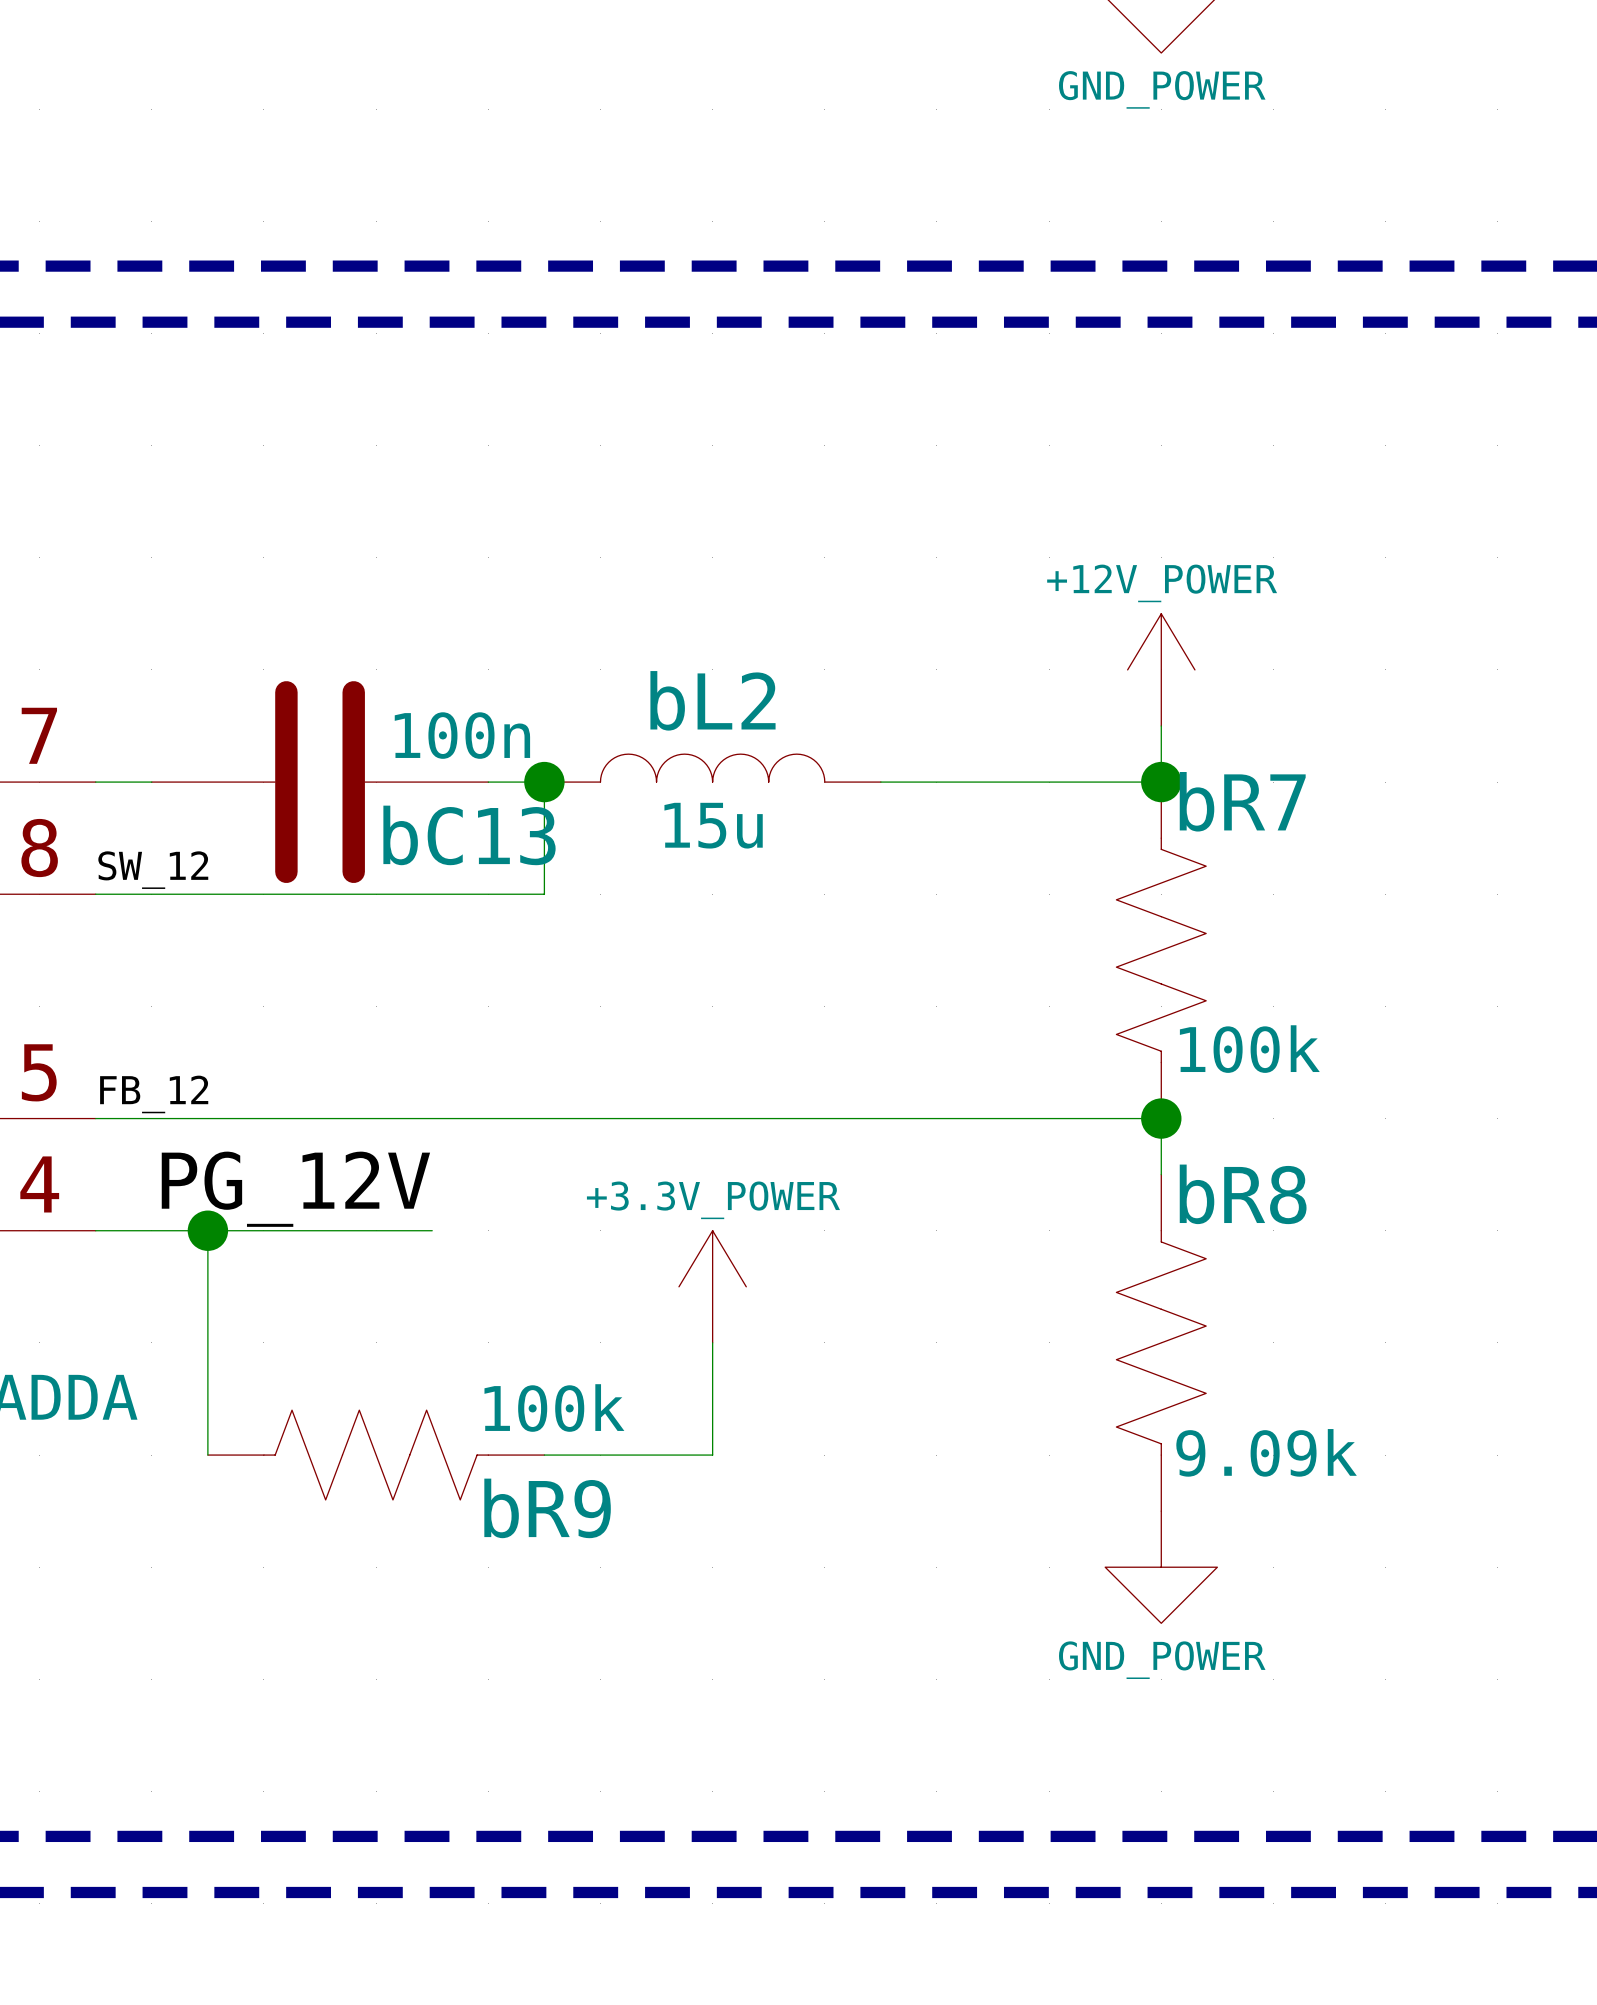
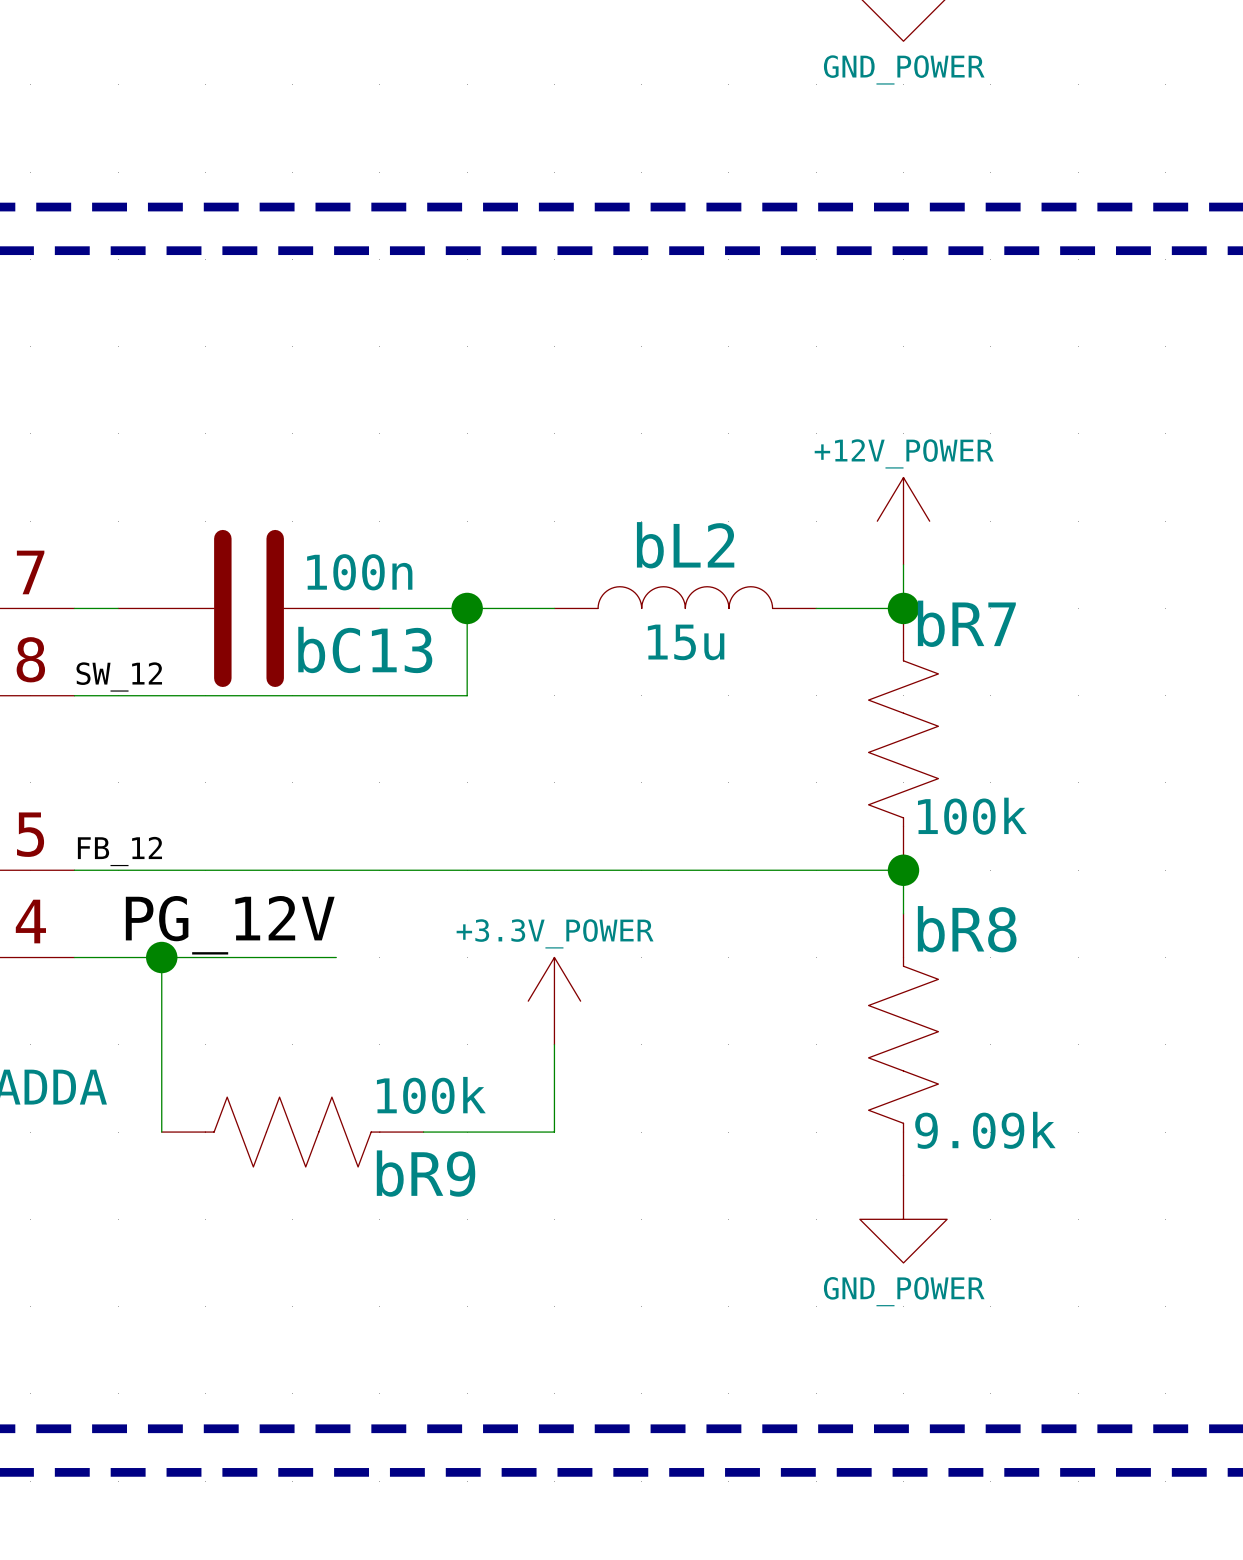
bL2 position: (712, 768) -> (685, 597)
wire: (544, 782) (544, 894) -> (467, 608) (467, 695) (423, 695)
junction position: (544, 782) -> (467, 608)
wire: (880, 782) (1049, 782) -> (423, 608) (554, 608)

